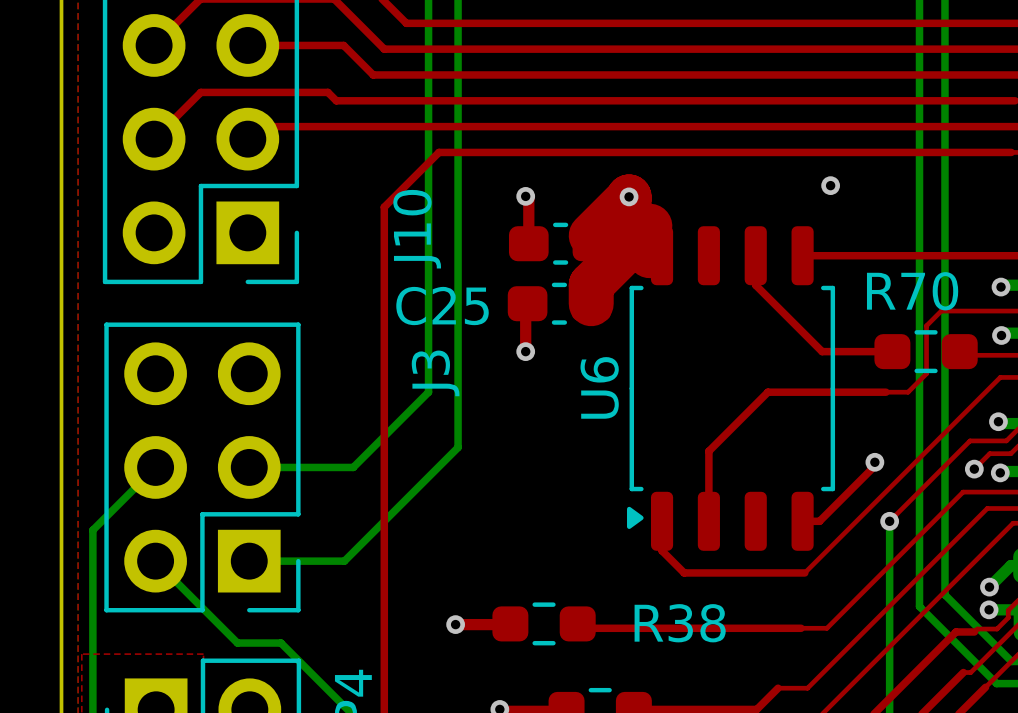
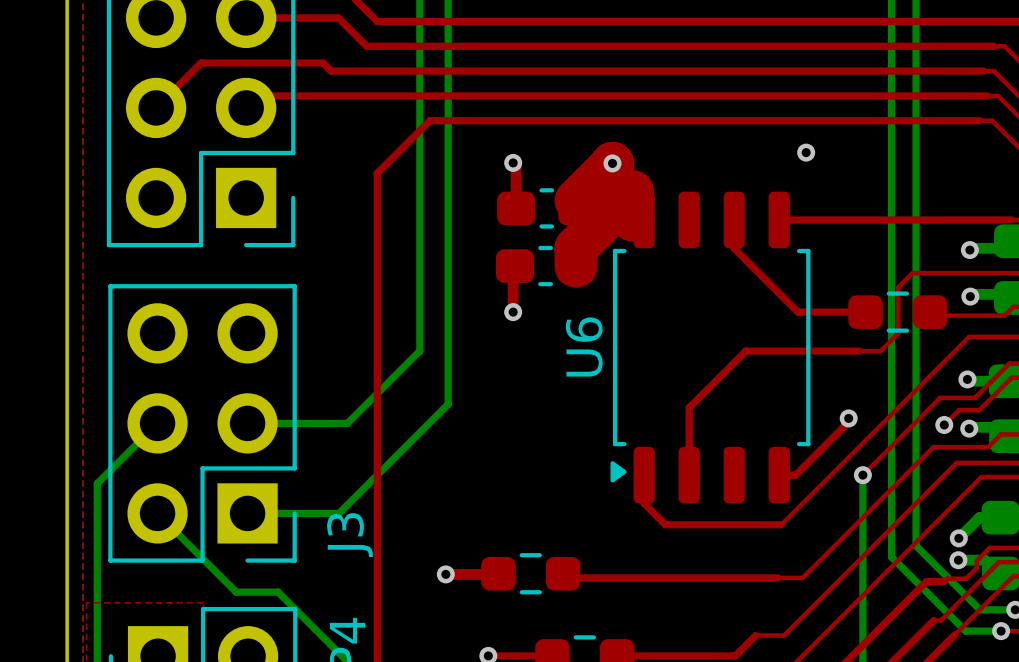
J10 name: J10 (417, 229) -> none
R70 name: R70 (912, 291) -> none
C25 name: C25 (442, 306) -> none
J3 name position: J3 (435, 373) -> J3 (350, 535)
R38 name: R38 (680, 623) -> none

